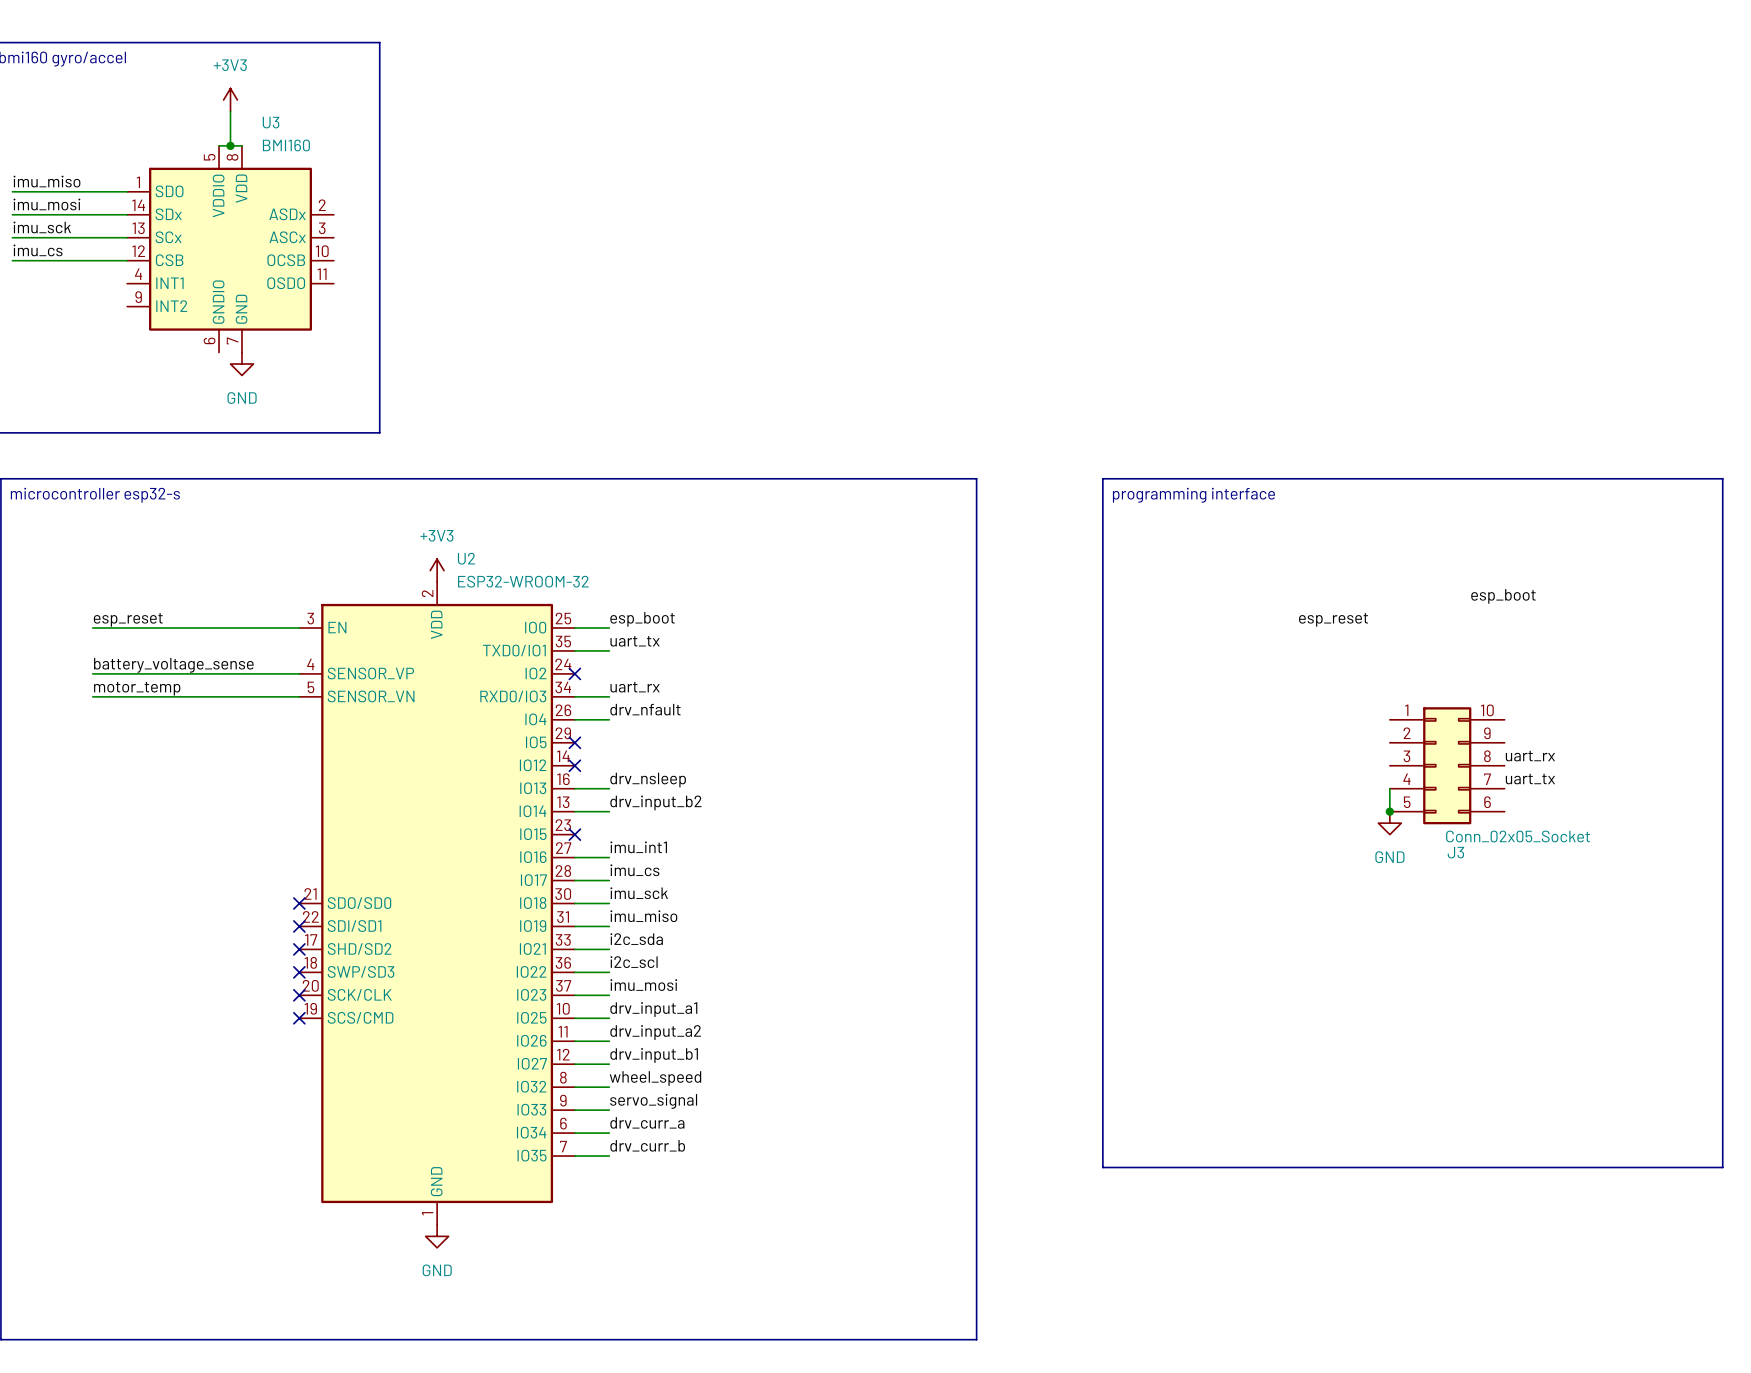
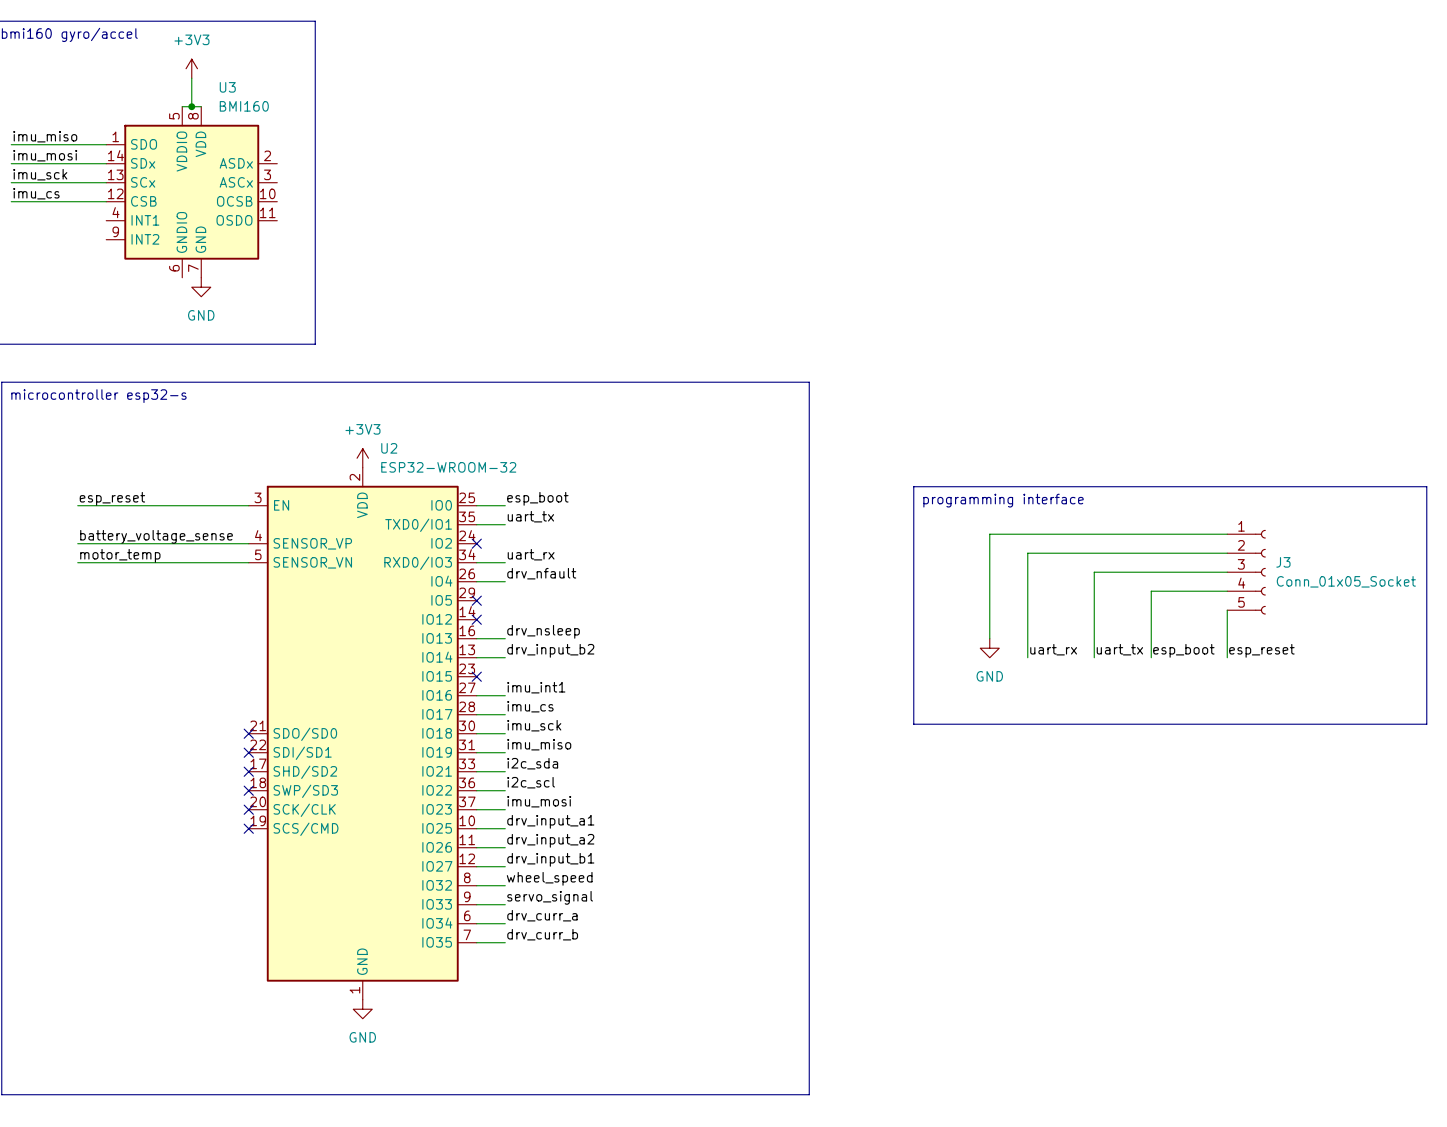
text position: programming interface (1193, 495) -> programming interface (1003, 500)
label position: esp_boot (1503, 596) -> esp_boot (1183, 650)
line: (1102, 605) (1102, 478) (1722, 478) (1722, 605) -> (913, 486) (1426, 486)
label: esp_reset (1333, 619) -> none
wire: none -> (1227, 534) (989, 534) (989, 638)
wire: none -> (1227, 553) (1027, 553) (1027, 657)
J3 symbol: [1389, 707, 1505, 825] -> [1227, 529, 1266, 615]
wire: none -> (1227, 572) (1094, 572) (1094, 657)
wire: none -> (1227, 591) (1151, 591) (1151, 638)
wire: none -> (1227, 610) (1227, 657)
label: uart_rx (1530, 756) -> none
label position: uart_tx (1530, 779) -> uart_tx (1119, 649)
label: none -> uart_rx (1053, 649)
label: none -> esp_reset (1261, 650)
junction: (1389, 811) -> none
power symbol position: GND (1389, 823) -> GND (989, 648)
J3 value: Conn_02x05_Socket (1518, 836) -> Conn_01x05_Socket (1346, 581)
J3 name position: J3 (1455, 852) -> J3 (1283, 562)
line: (1102, 892) (1102, 1167) (1722, 1167) (1722, 892) -> (913, 724) (1426, 724)

